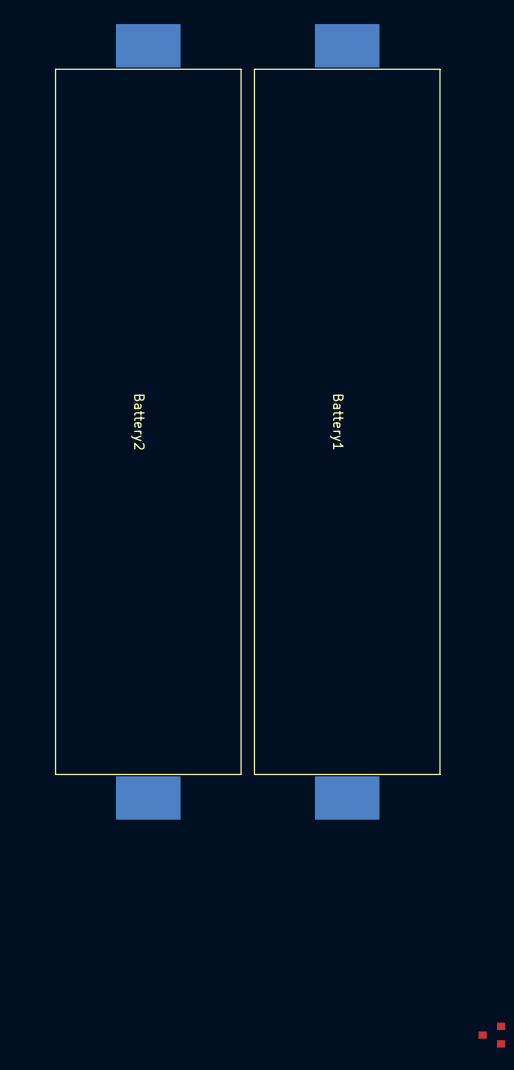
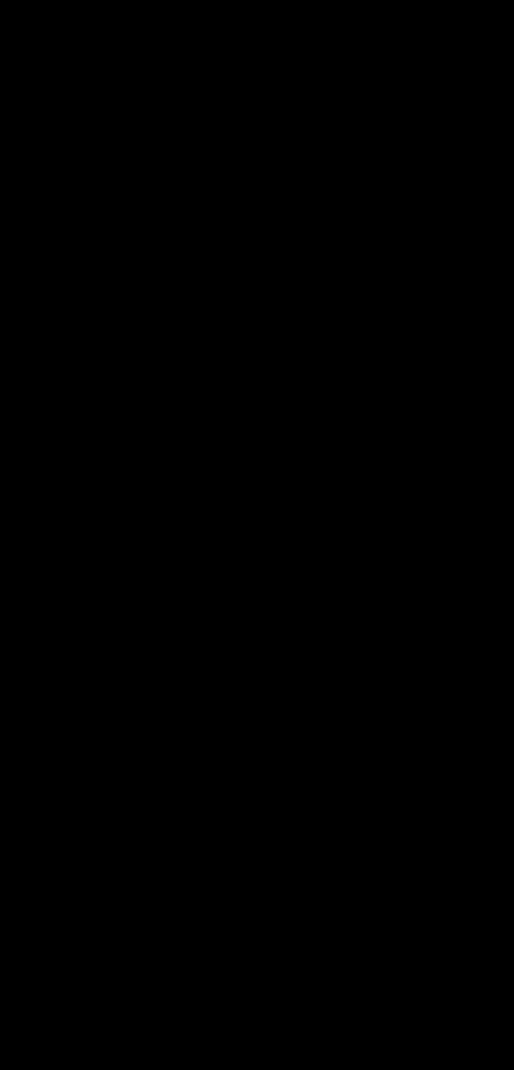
Battery2: (148, 421) -> none
Battery1: (347, 421) -> none
part: (491, 1035) -> none

